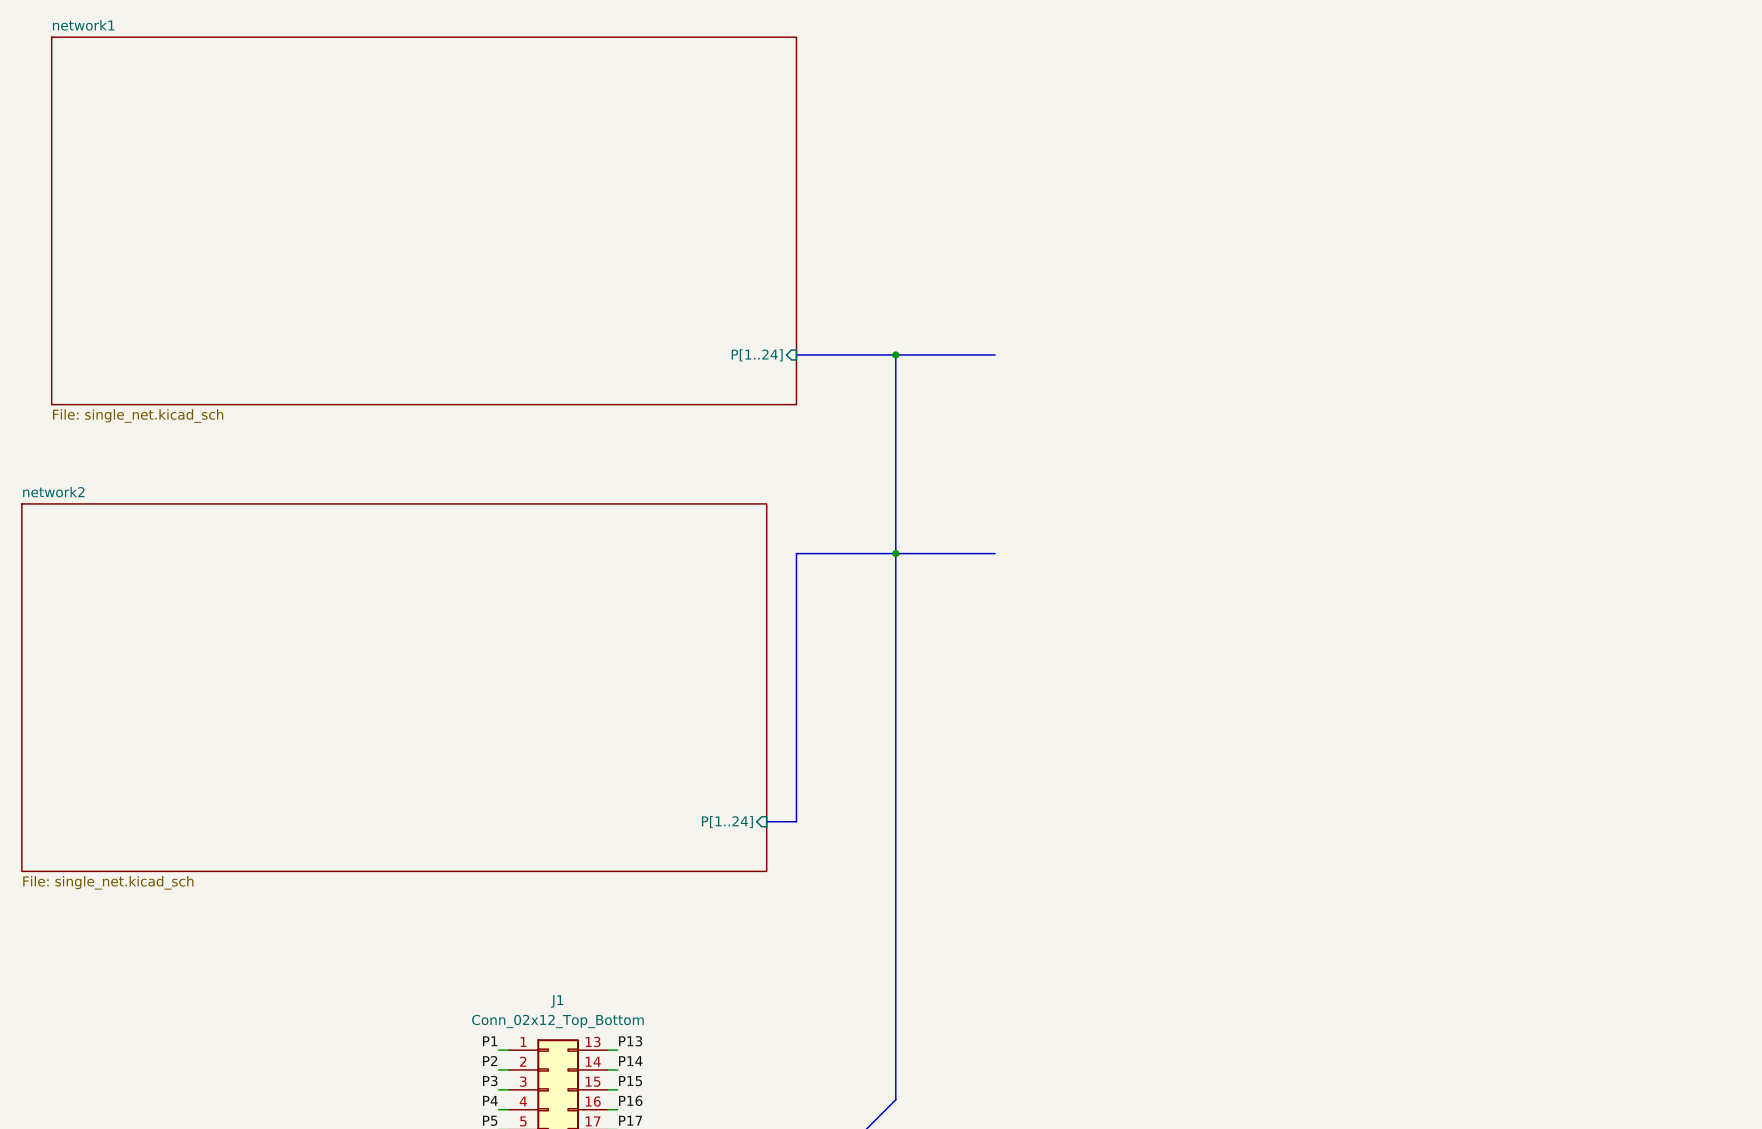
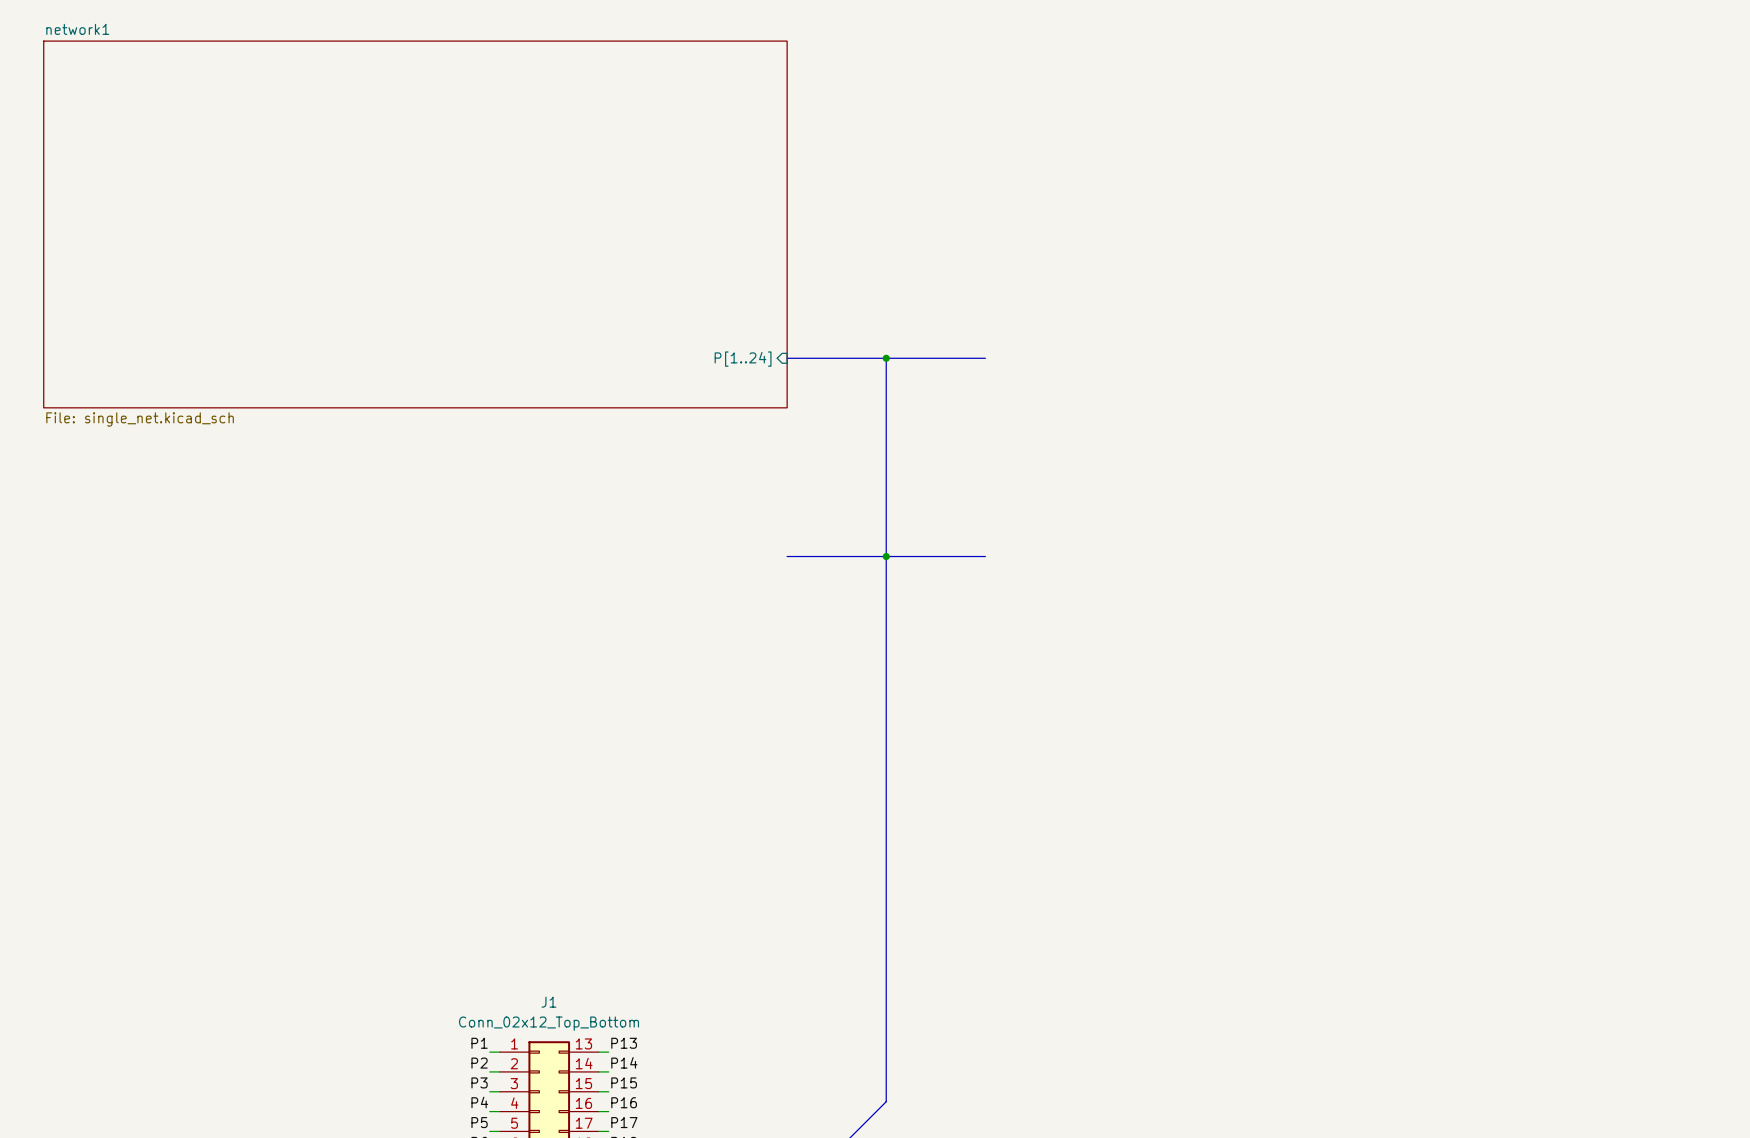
bus: (796, 553) (796, 821) (766, 821) -> none
sheet network2: File: single_net.kicad_sch (394, 687) -> none
sheet pin: P[1..24] (727, 822) -> none

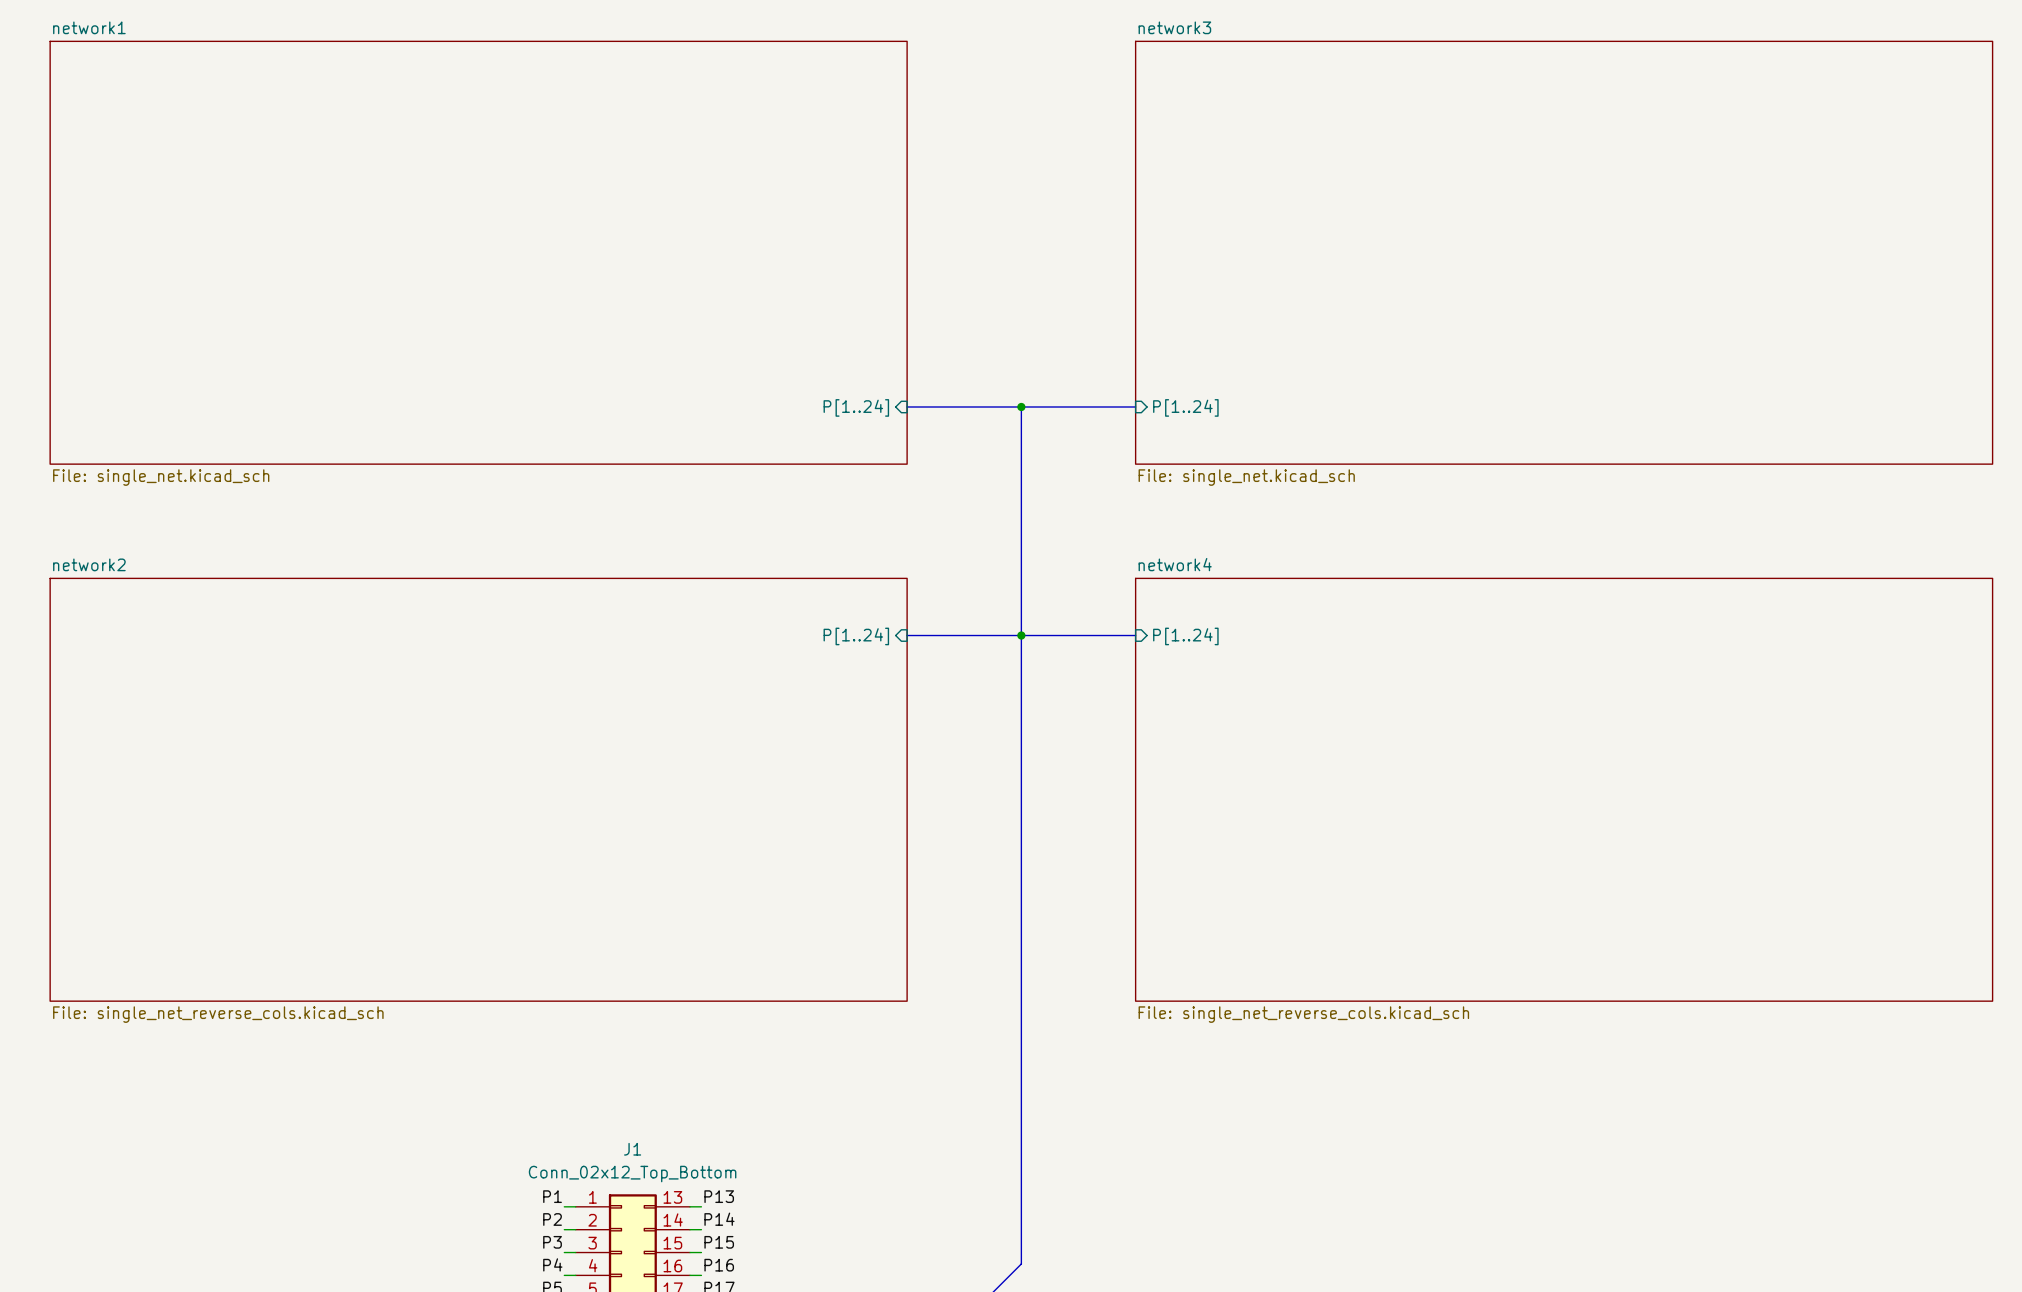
sheet network3: none -> File: single_net.kicad_sch (1564, 252)
sheet pin: none -> P[1..24] (1185, 407)
sheet pin: none -> P[1..24] (856, 636)
sheet pin: none -> P[1..24] (1185, 636)
sheet network2: none -> File: single_net_reverse_cols.kicad_sch (478, 789)
sheet network4: none -> File: single_net_reverse_cols.kicad_sch (1564, 789)

